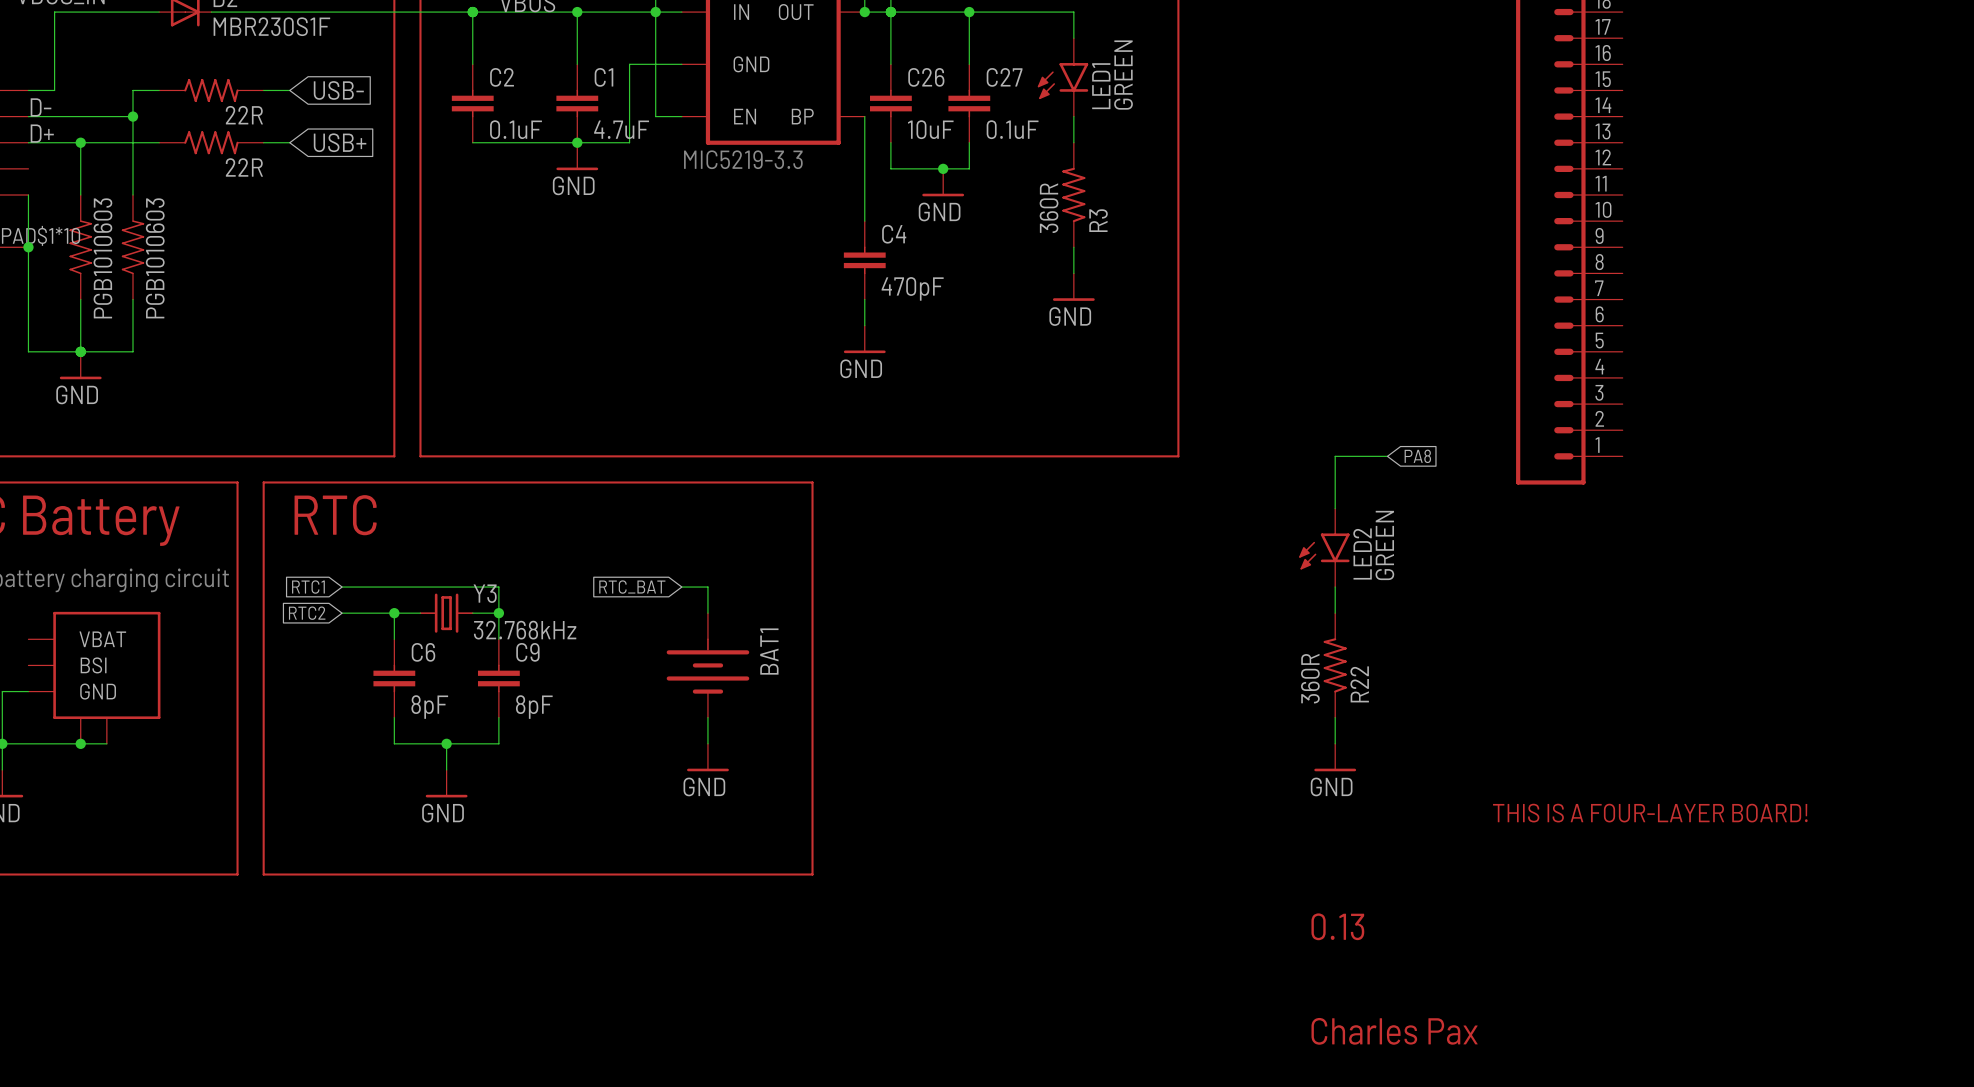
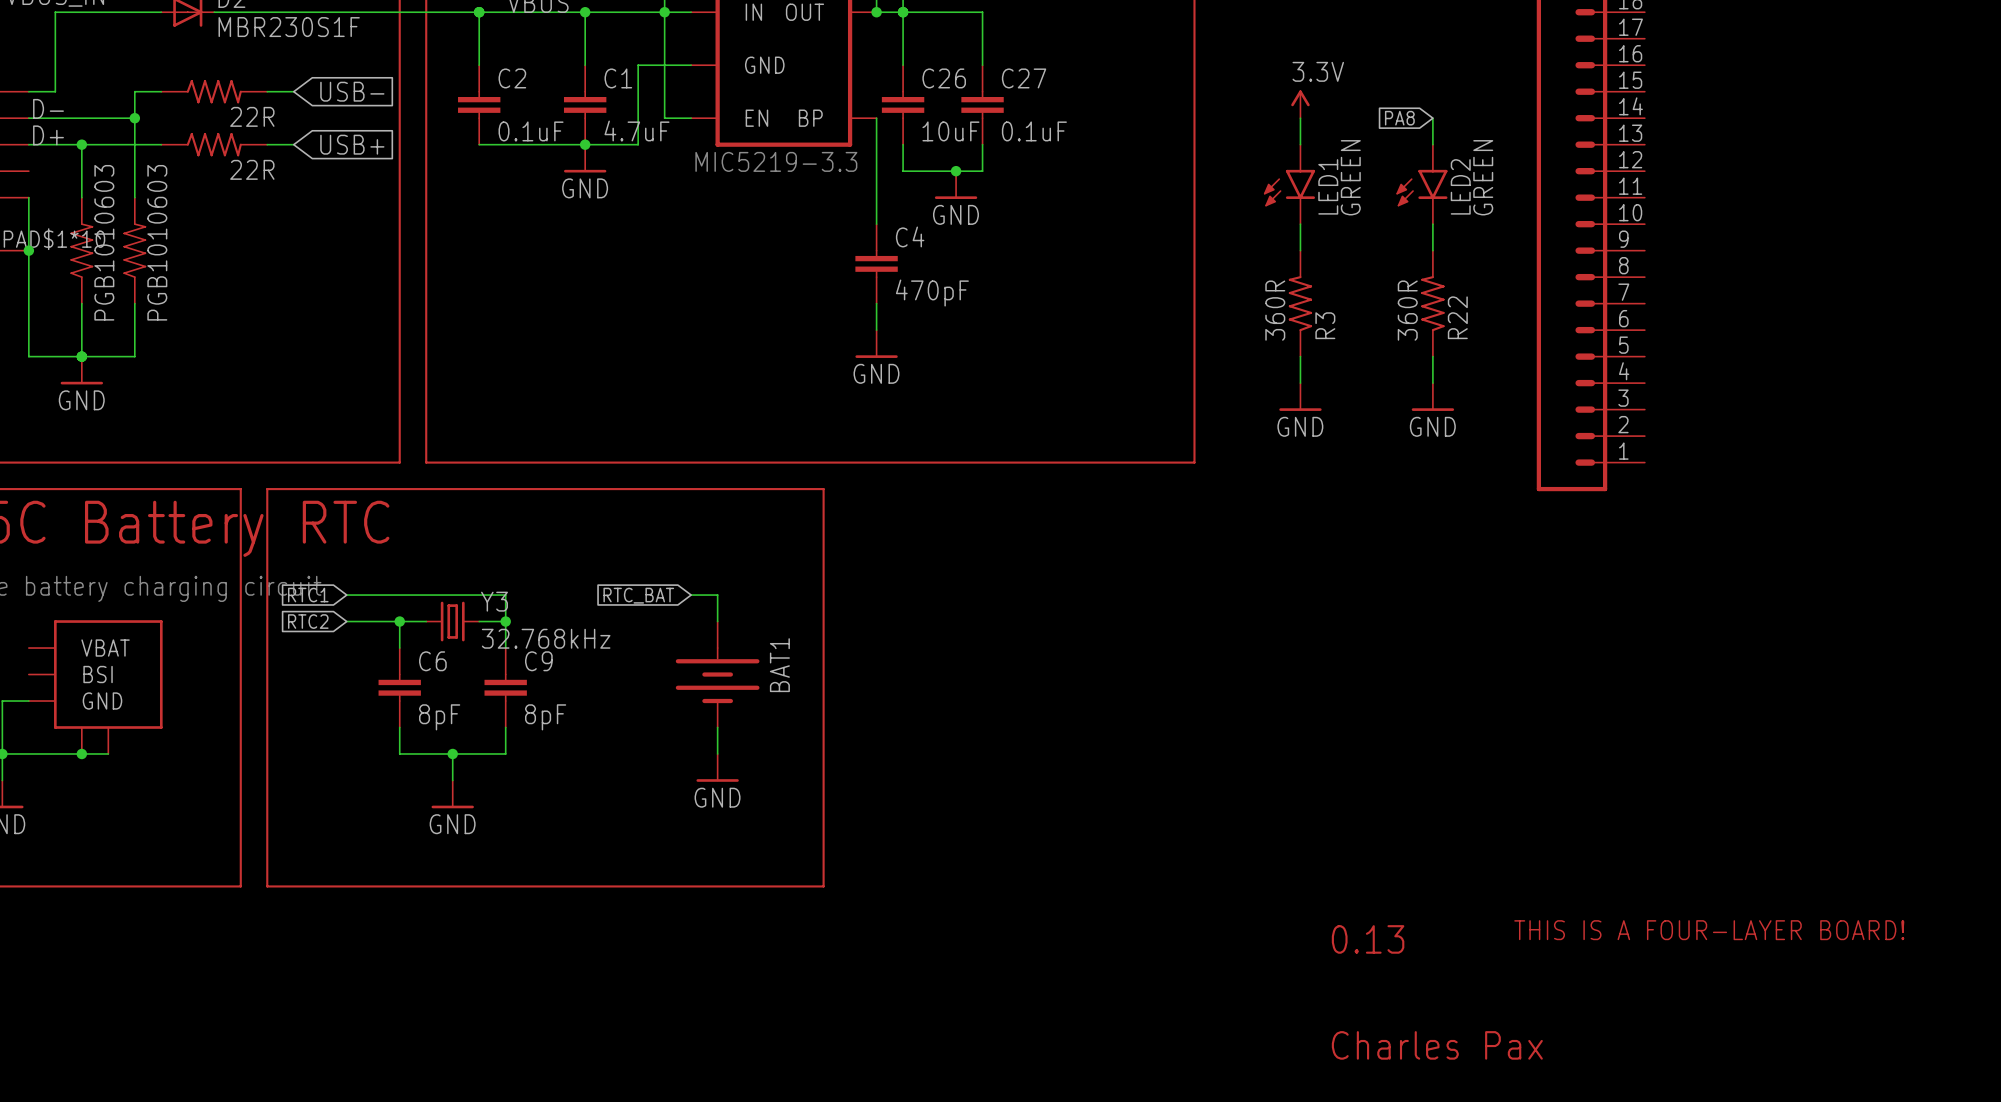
wire: (969, 12) (1073, 12) (1073, 38) -> none
junction: (969, 12) -> none
LED1 position: (1063, 77) -> (1289, 184)
power symbol: none -> 3.3V (1300, 104)
wire: (1073, 116) (1073, 142) -> (1300, 224) (1300, 250)
wire: none -> (1300, 118) (1300, 144)
global label: none -> PA8 (1399, 118)
wire: none -> (1432, 118) (1432, 144)
R3 position: (1073, 195) -> (1300, 303)
wire: none -> (1432, 224) (1432, 250)
wire: (1073, 247) (1073, 273) -> (1300, 356) (1300, 383)
power symbol: GND (1073, 287) -> none
power symbol: none -> GND (1300, 397)
power symbol: none -> GND (1432, 397)
wire: (1387, 456) (1335, 456) (1335, 508) -> none
global label: PA8 (1417, 456) -> none
LED2 position: (1324, 547) -> (1421, 184)
wire: (1335, 587) (1335, 613) -> (1432, 356) (1432, 383)
R22 position: (1335, 665) -> (1432, 303)
wire: (1335, 717) (1335, 743) -> none
power symbol: GND (1335, 757) -> none
part position: (1650, 813) -> (1709, 930)

